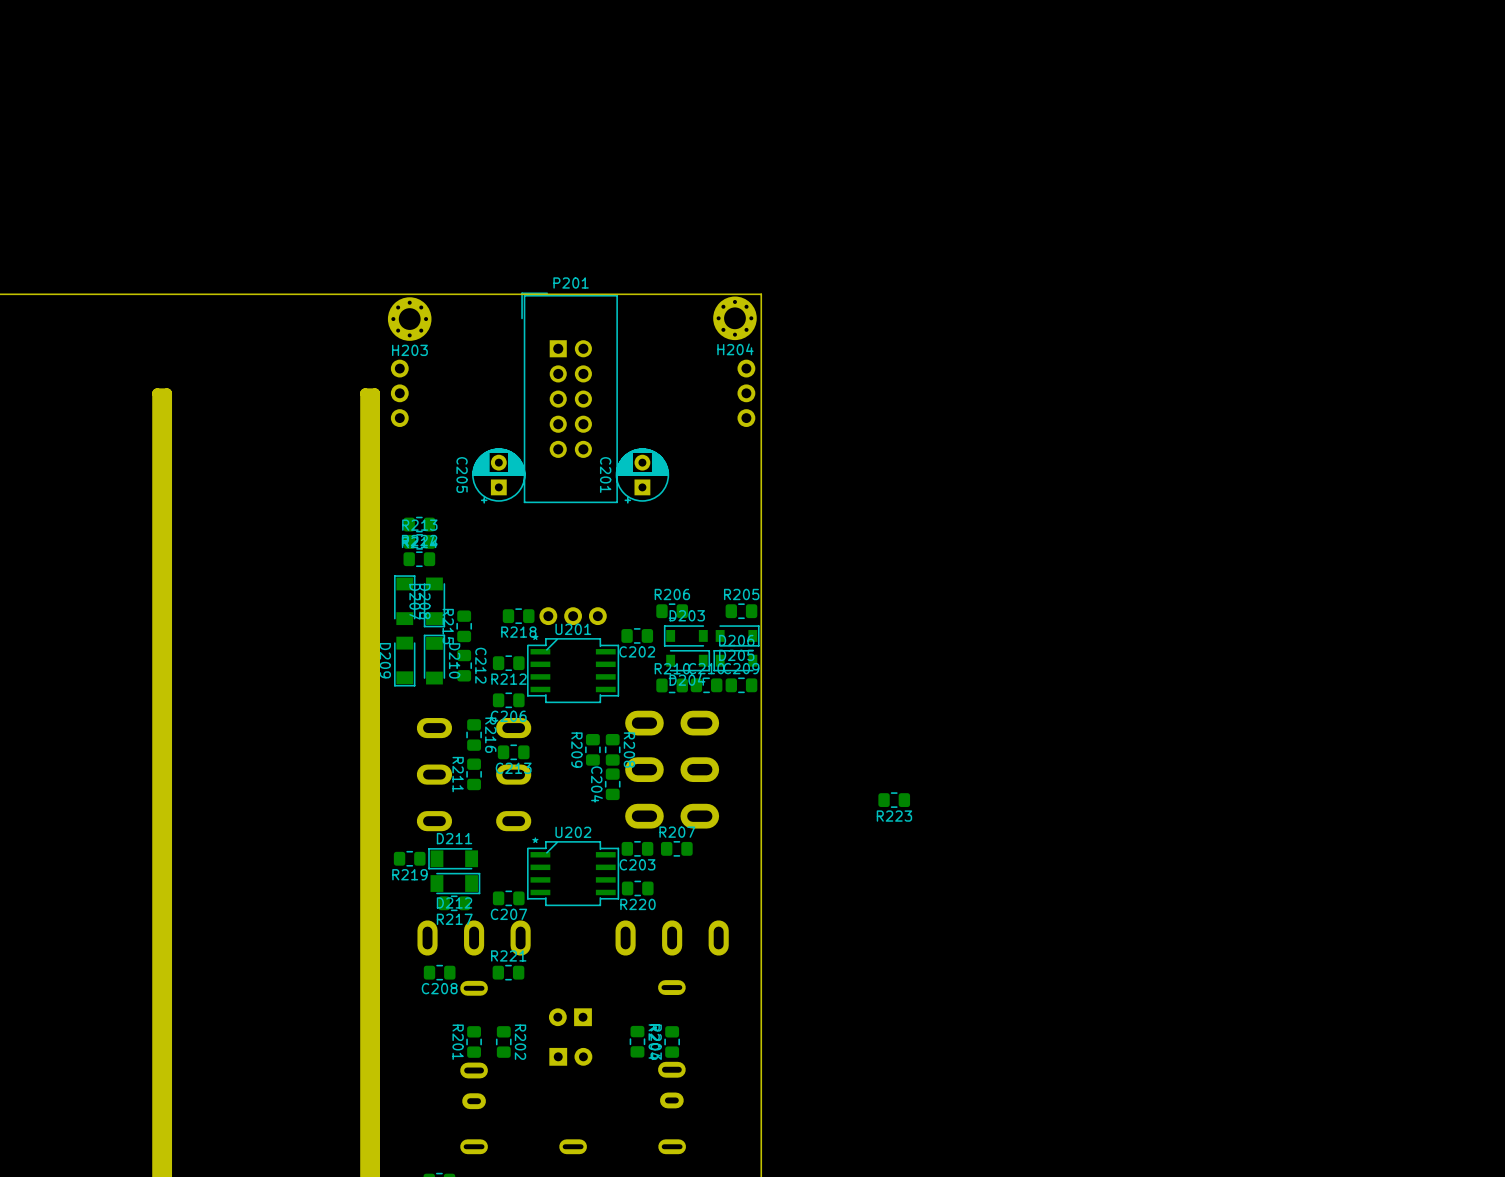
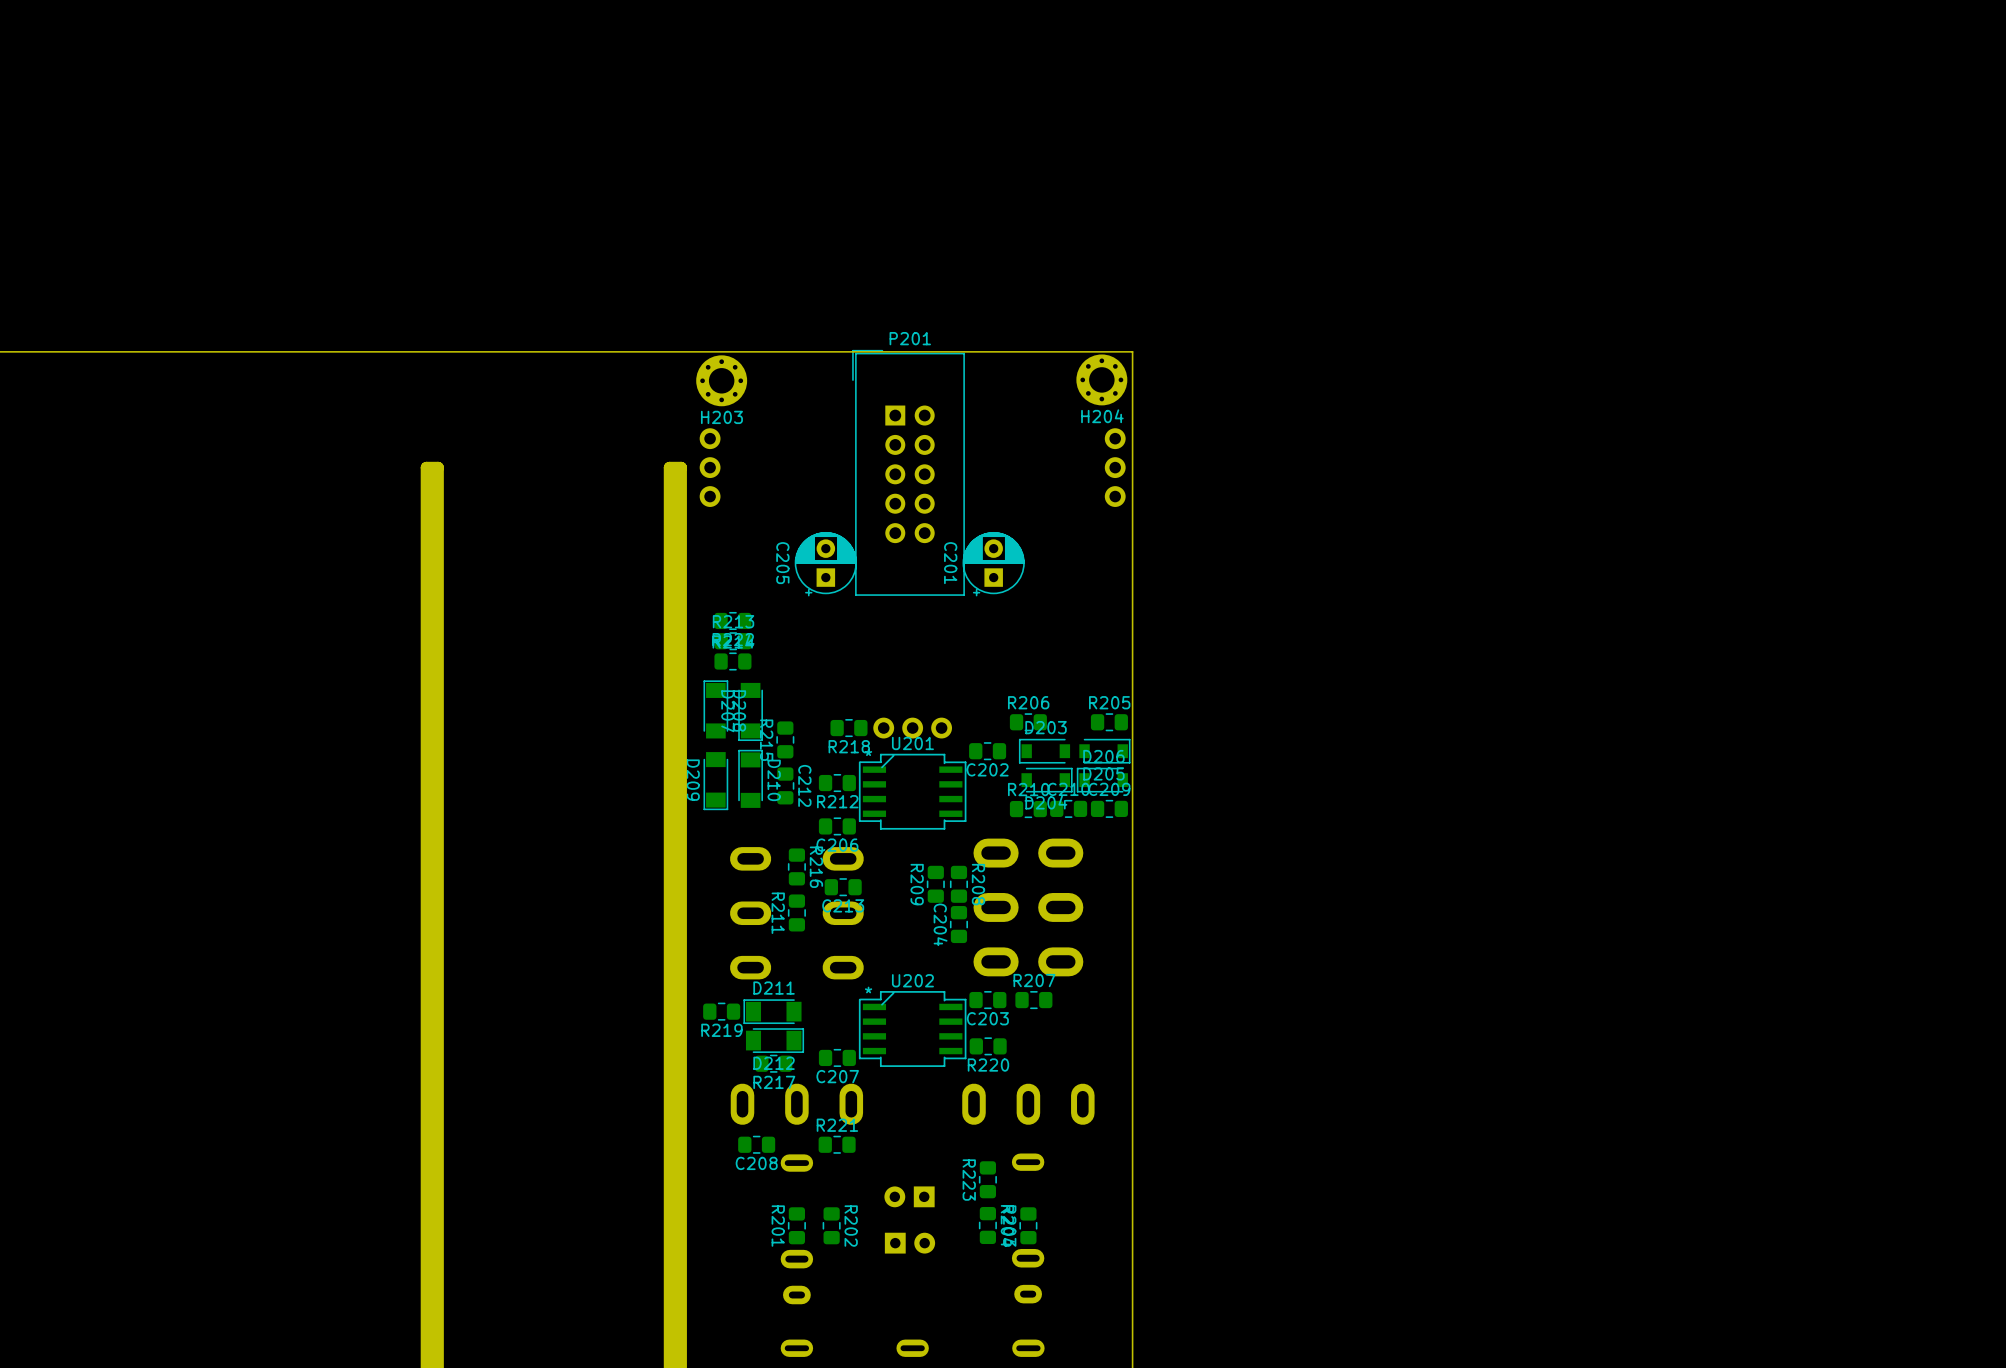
R223 rotation: 0° (894, 800) -> 90° clockwise (987, 1179)
R223 position: (894, 800) -> (987, 1179)

